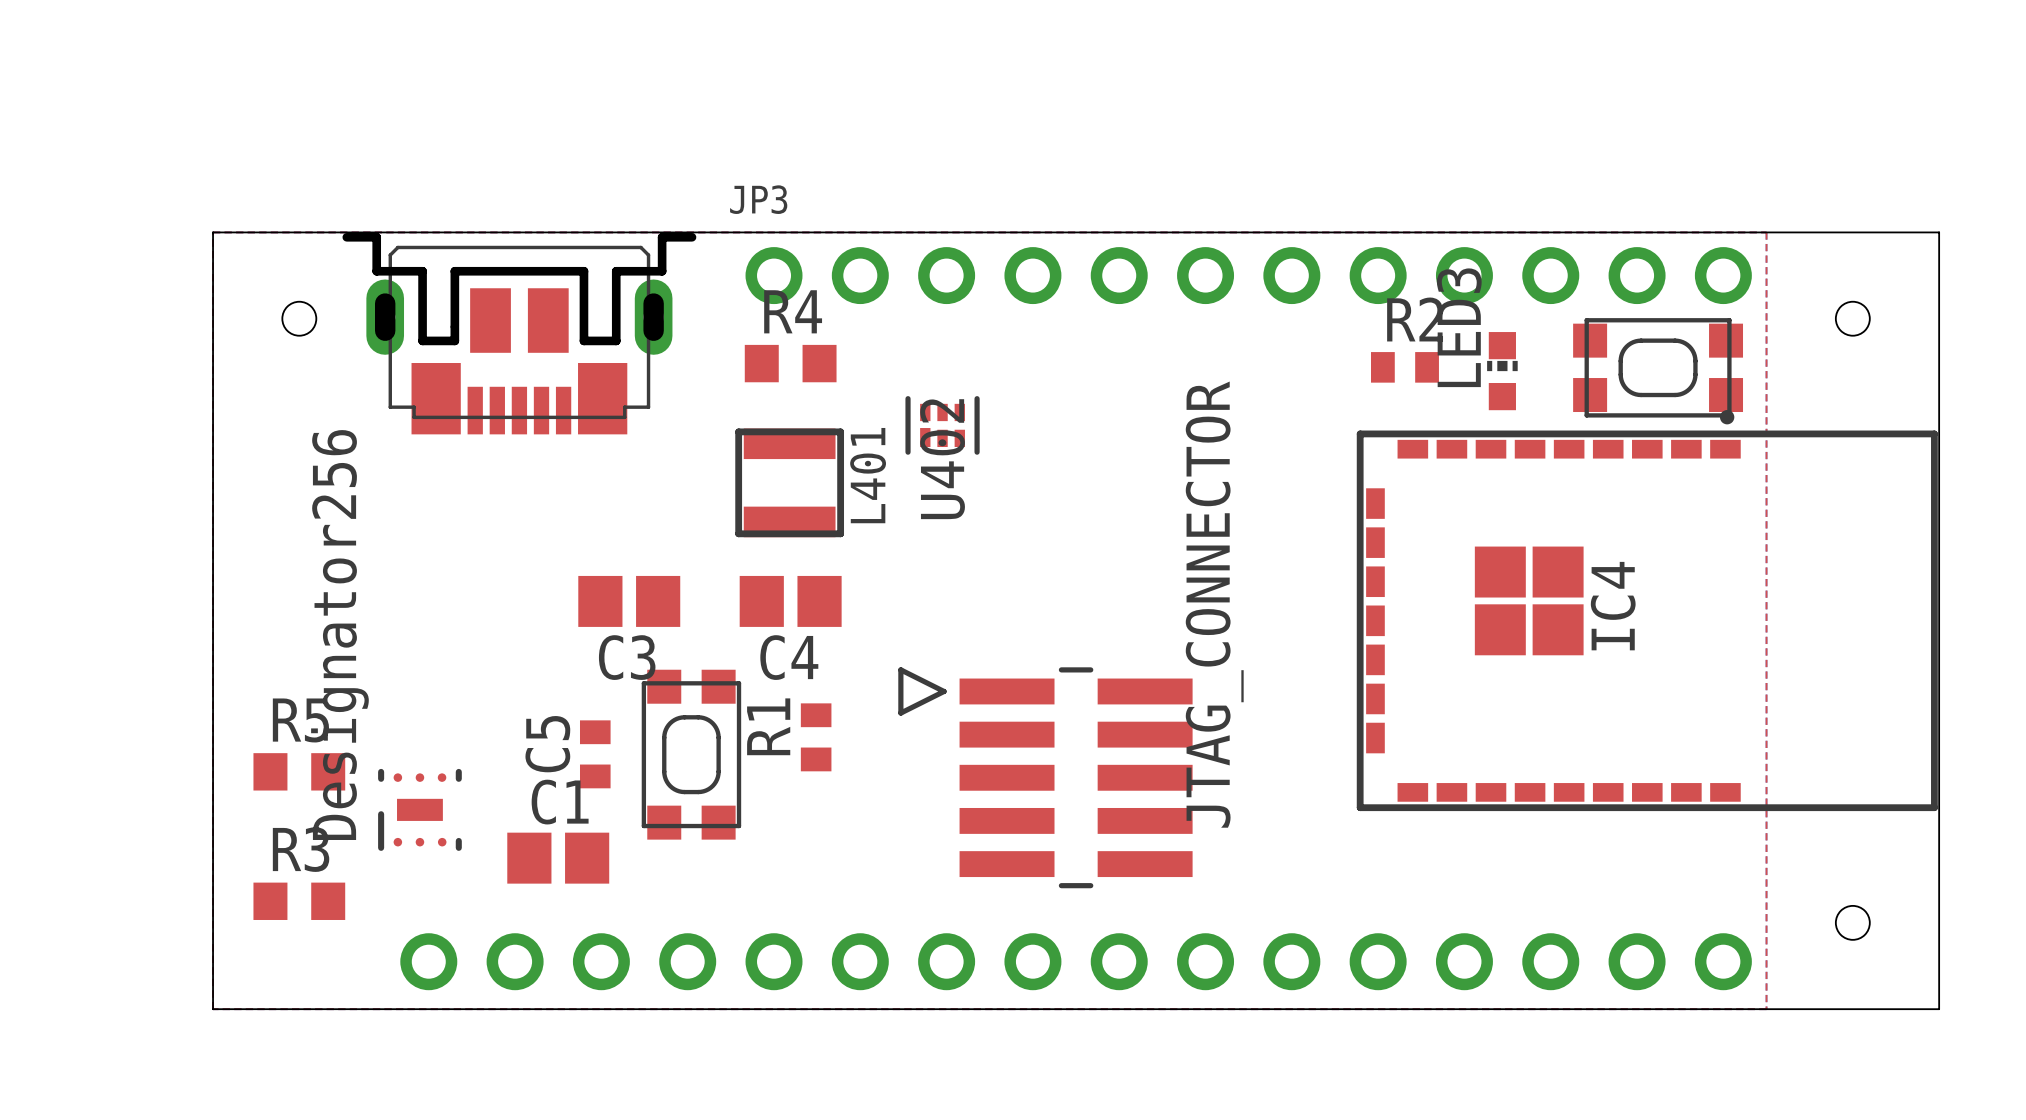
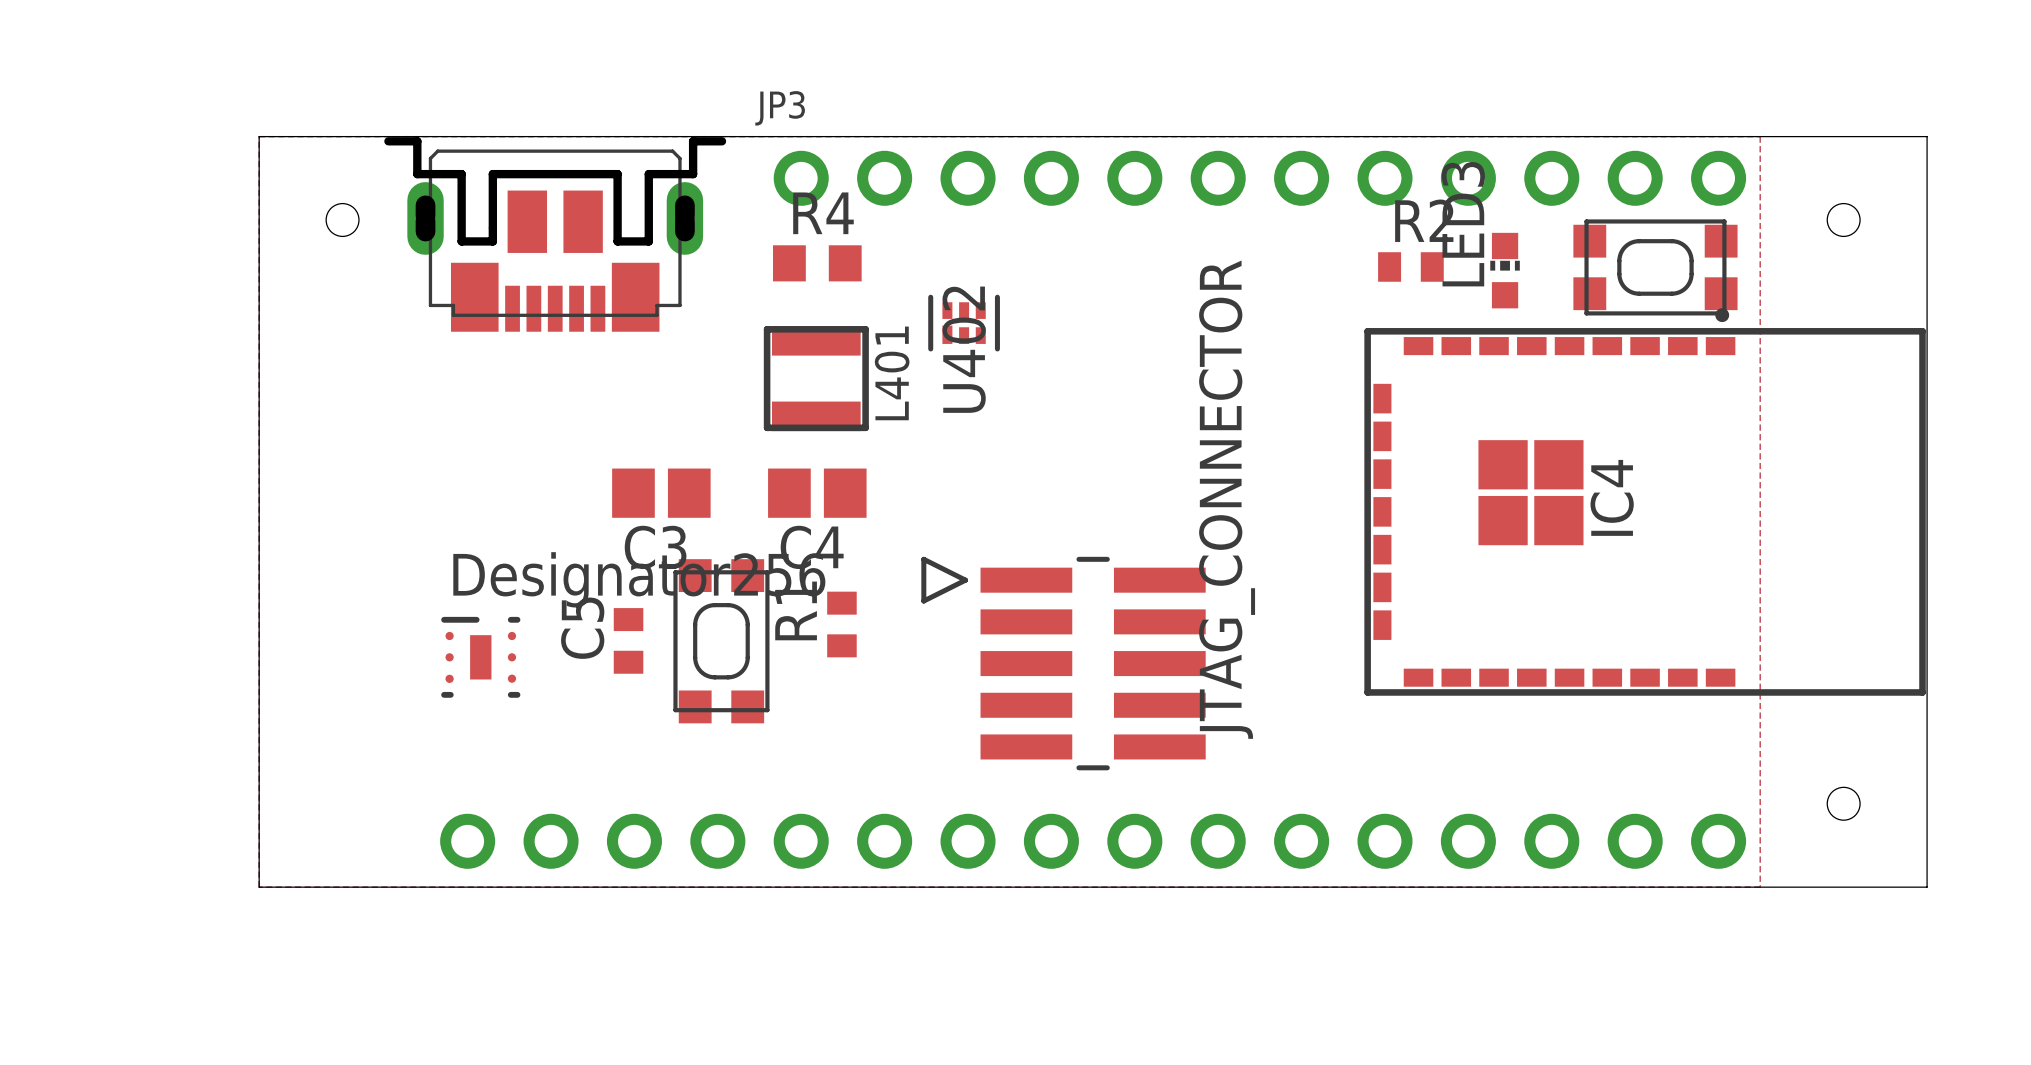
R5: (299, 771) -> none
part rotation: 0° (419, 809) -> 90° clockwise (480, 657)
C1: (558, 858) -> none
R3: (299, 901) -> none

